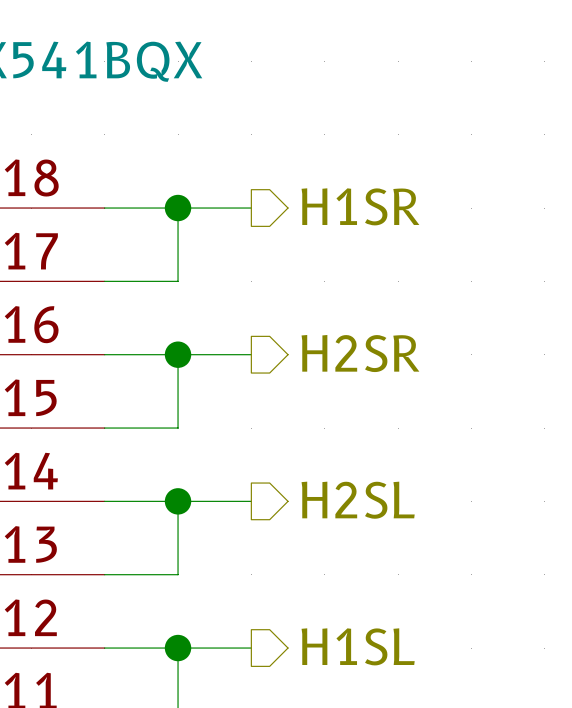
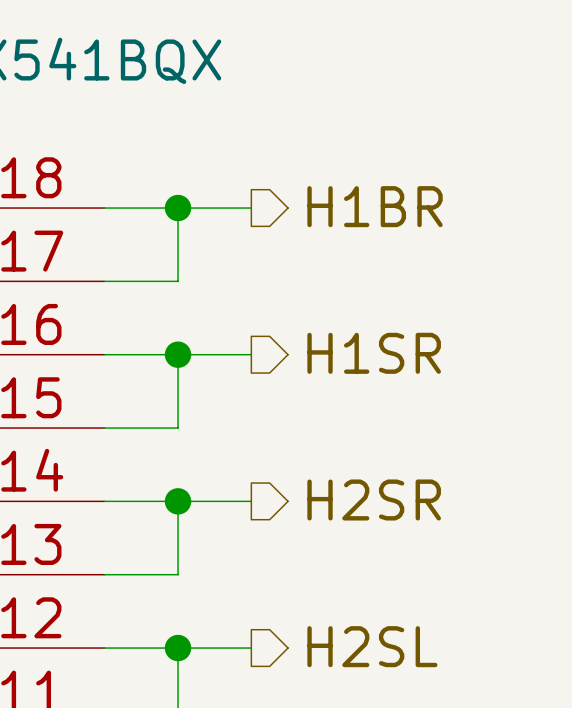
hierarchical label: H1SR (360, 206) -> H1BR (375, 206)
hierarchical label: H2SR (360, 353) -> H1SR (374, 353)
hierarchical label: H2SL (358, 500) -> H2SR (374, 499)
hierarchical label: H1SL (358, 646) -> H2SL (372, 646)

